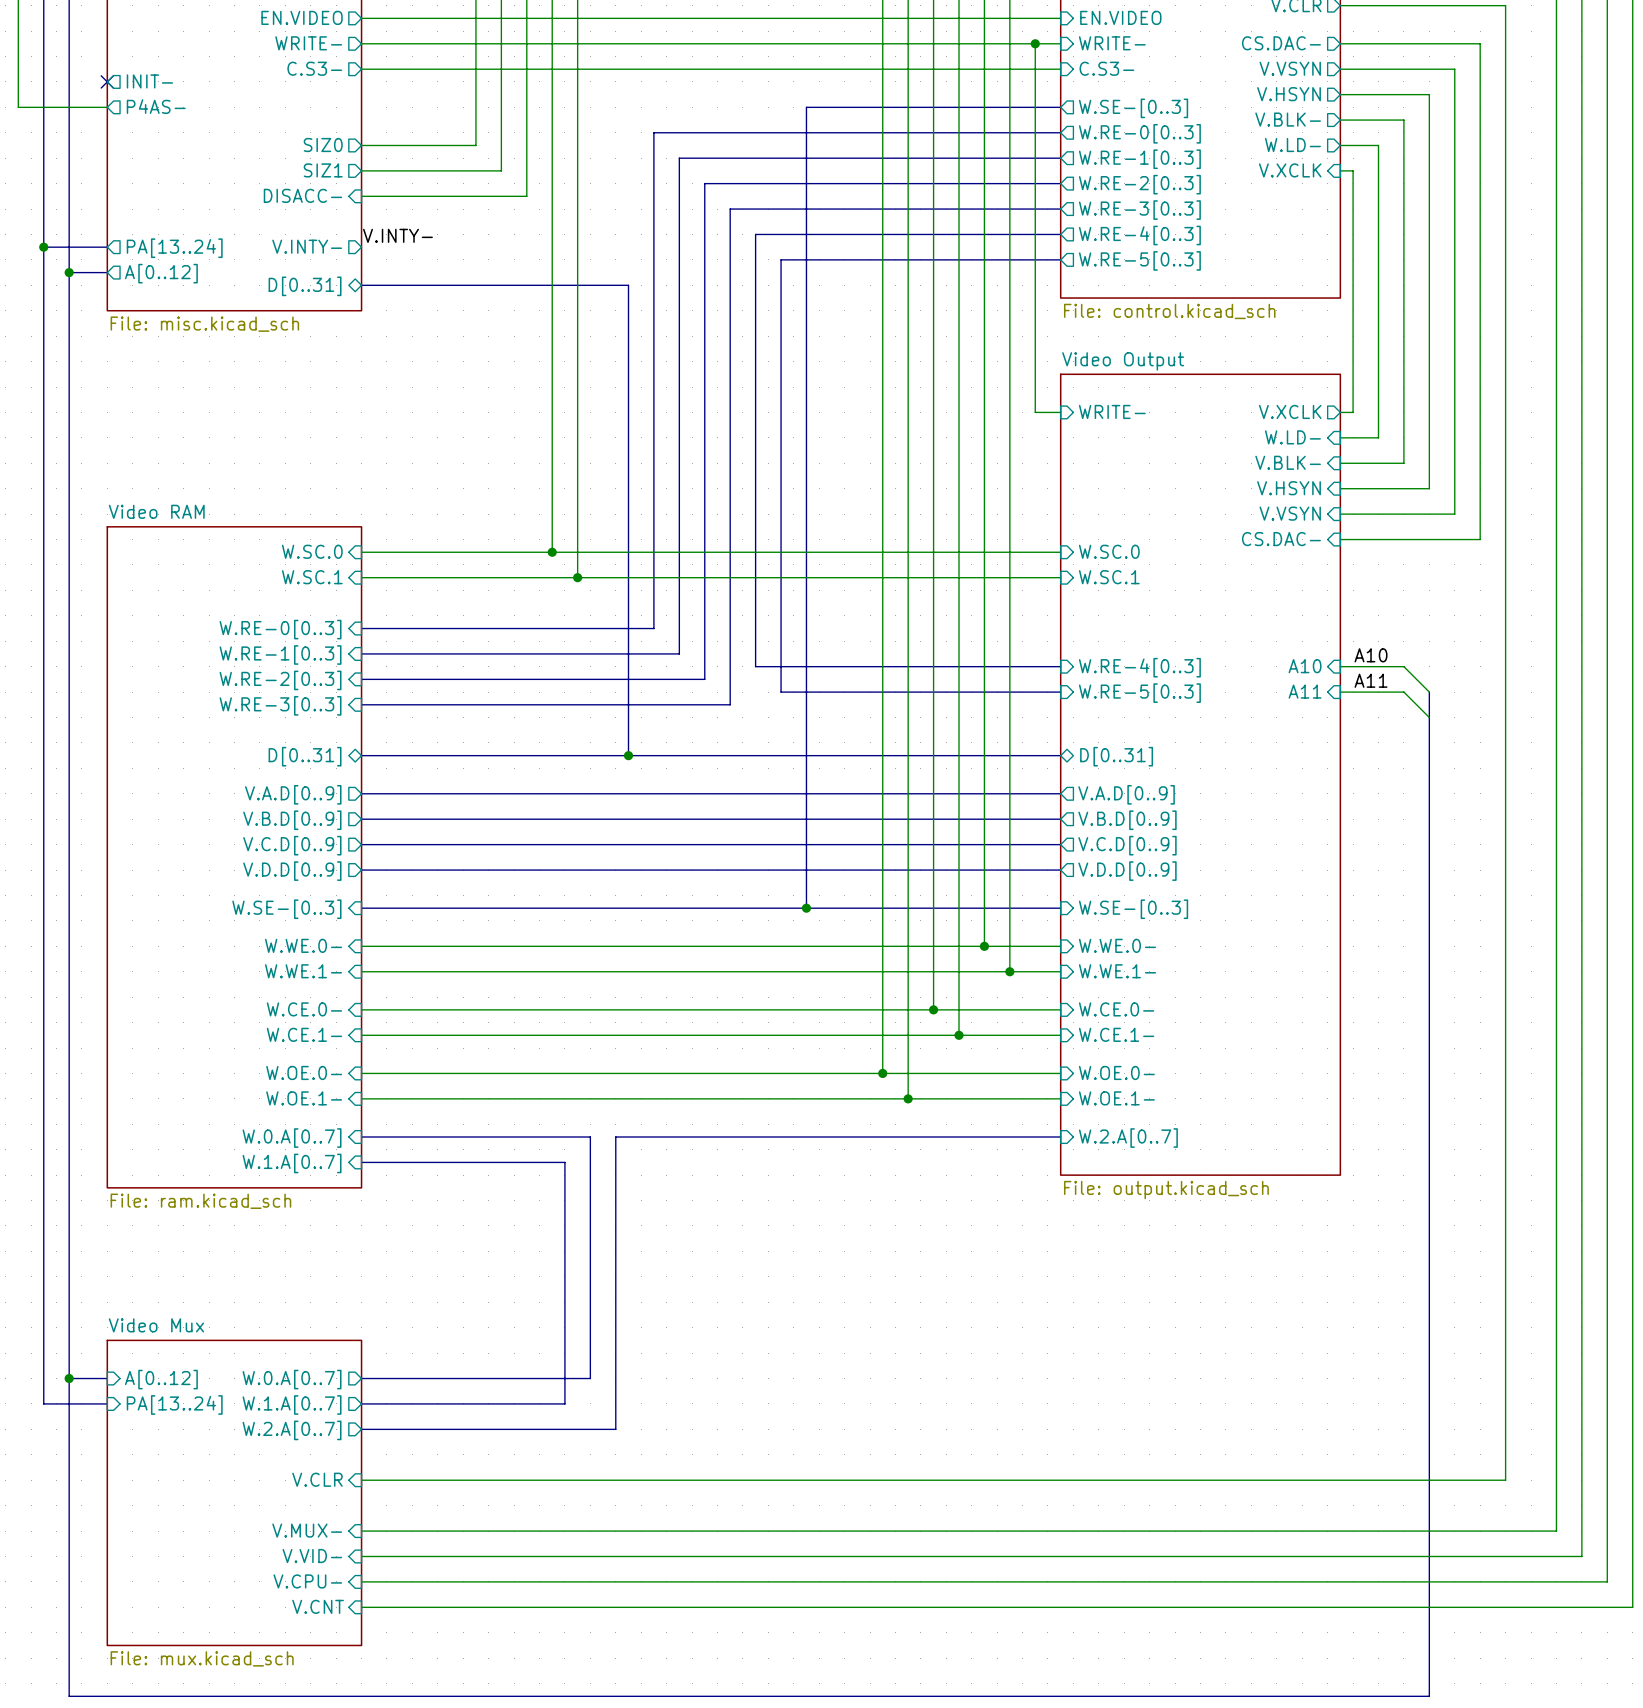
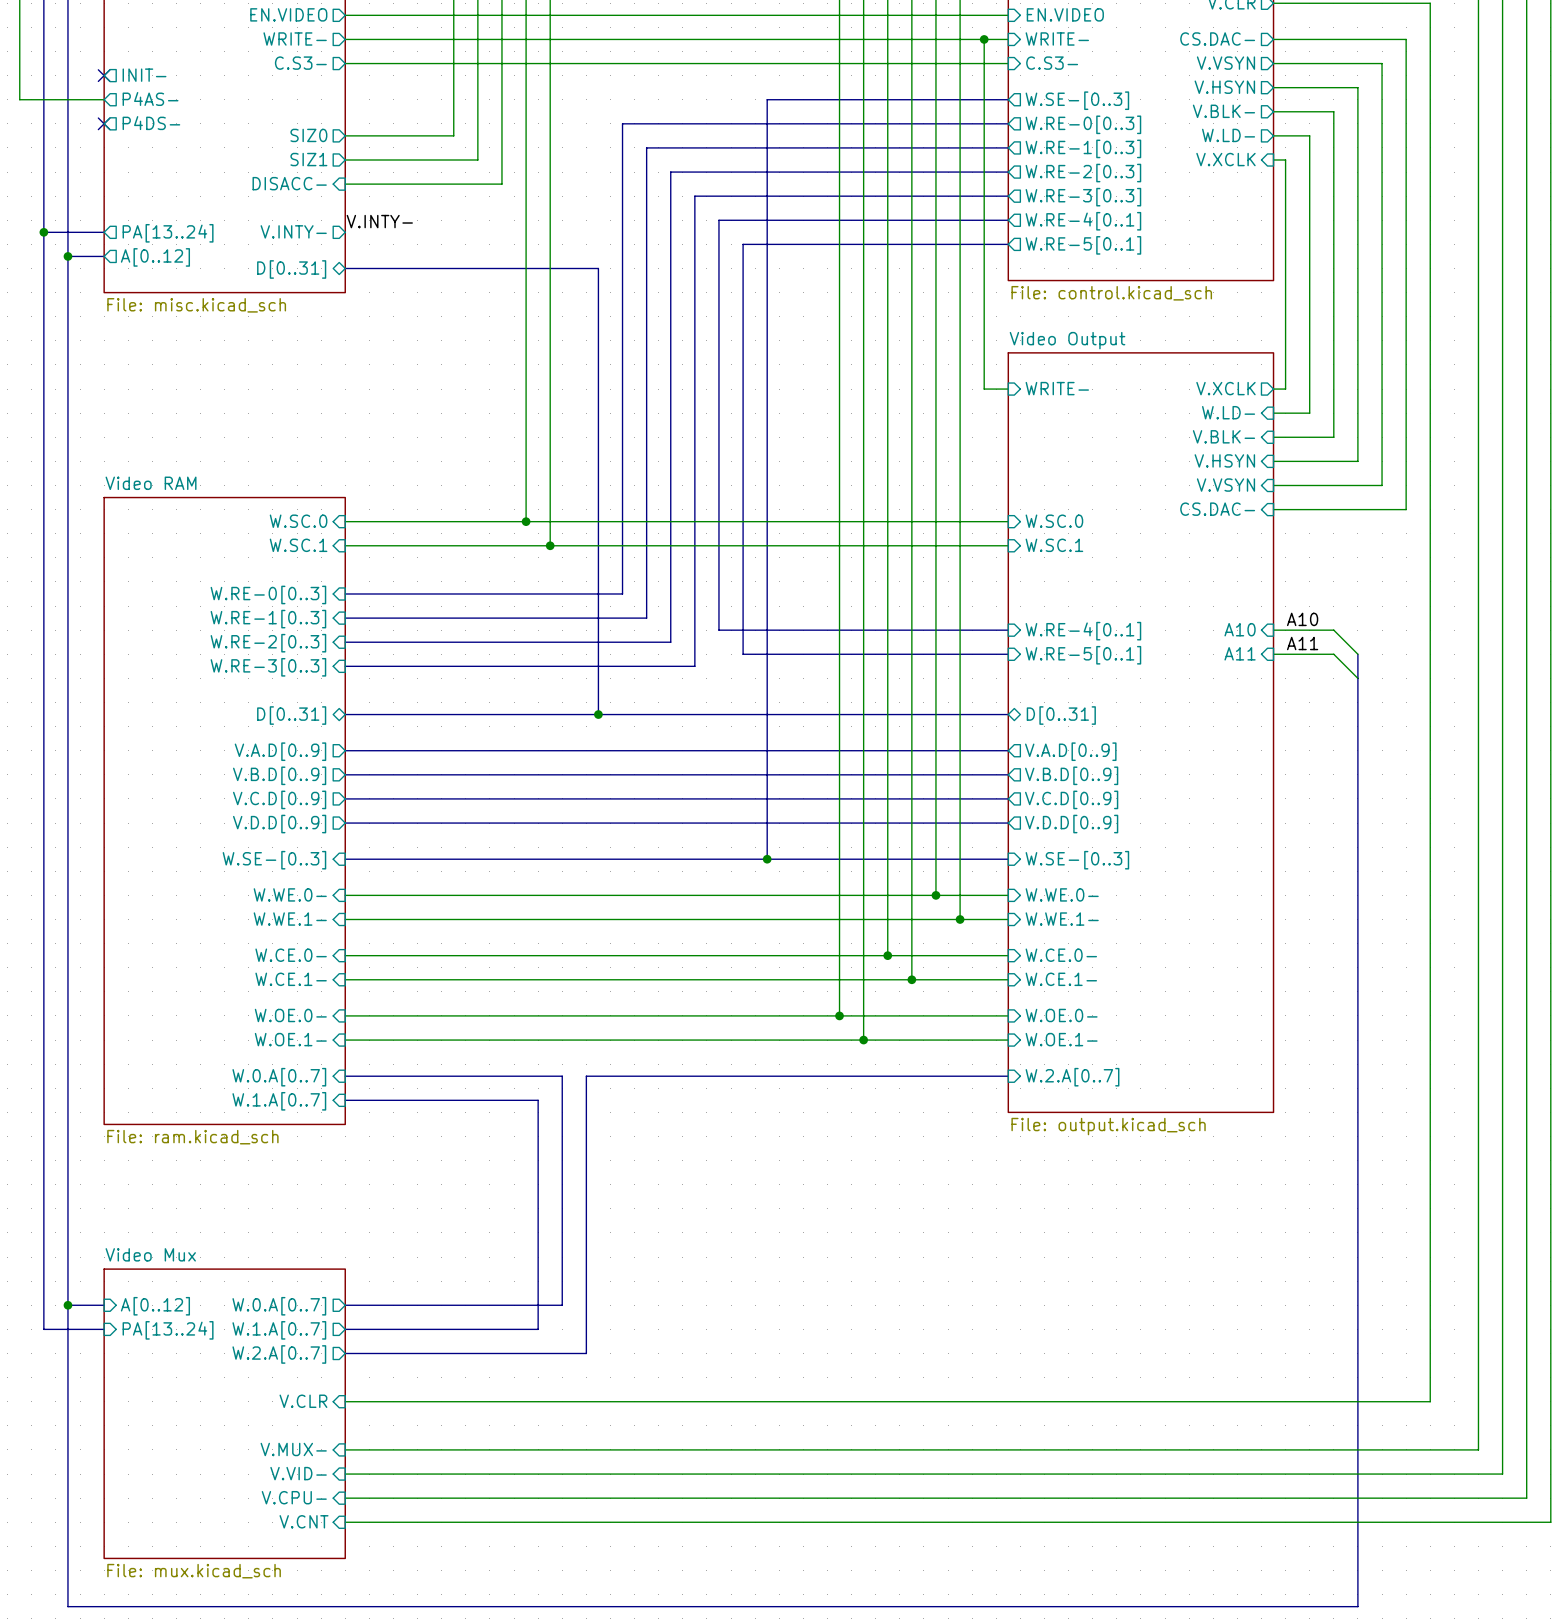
sheet pin: none -> P4DS- (151, 123)
no-connect mark: none -> (104, 123)
sheet pin: W.RE-4[0..3] (1139, 235) -> W.RE-4[0..1] (1083, 221)
sheet pin: W.RE-5[0..3] (1139, 260) -> W.RE-5[0..1] (1083, 245)
sheet pin: W.RE-4[0..3] (1139, 667) -> W.RE-4[0..1] (1083, 631)
sheet pin: W.RE-5[0..3] (1139, 693) -> W.RE-5[0..1] (1083, 655)

